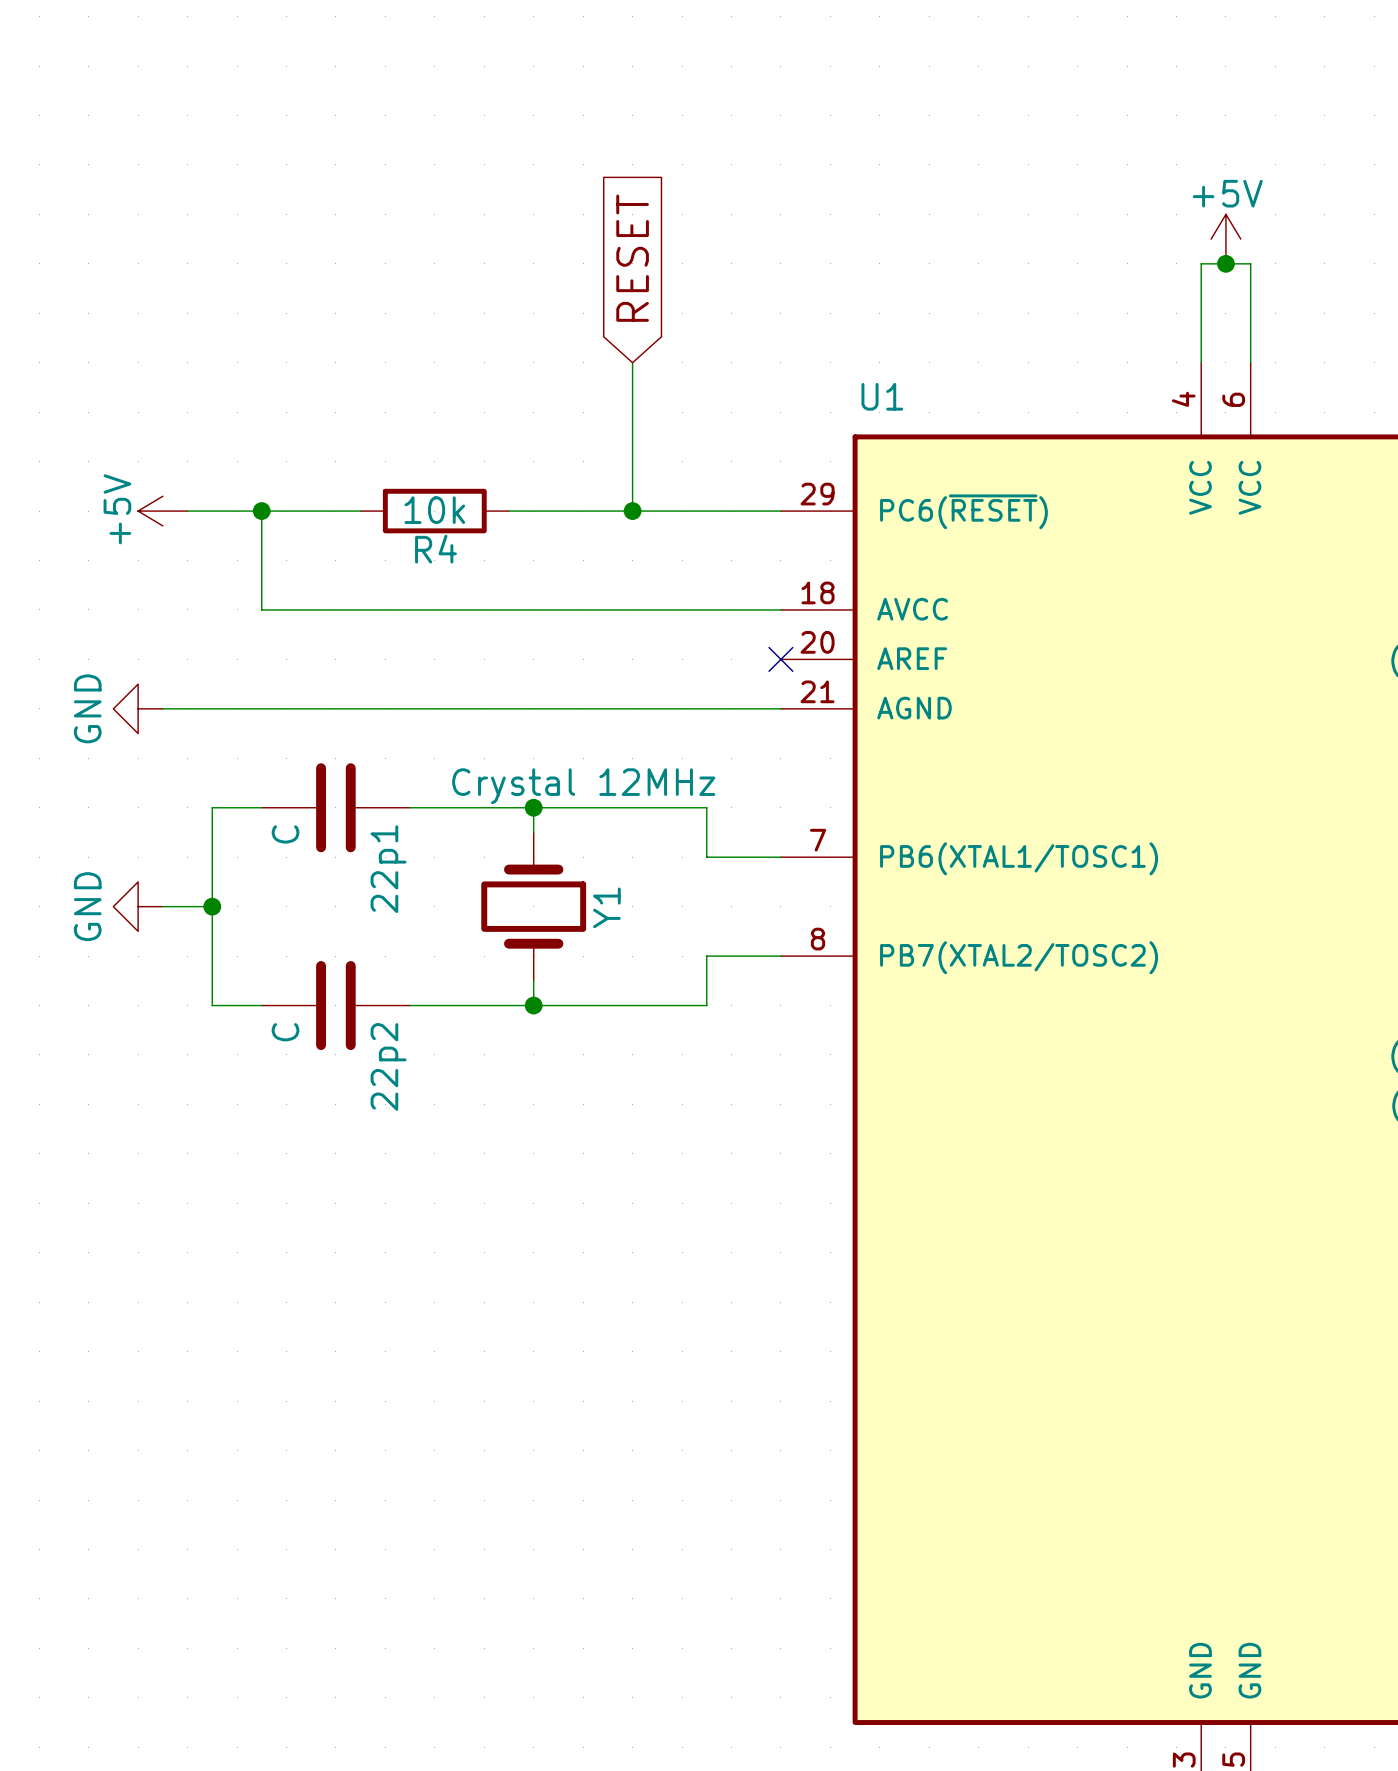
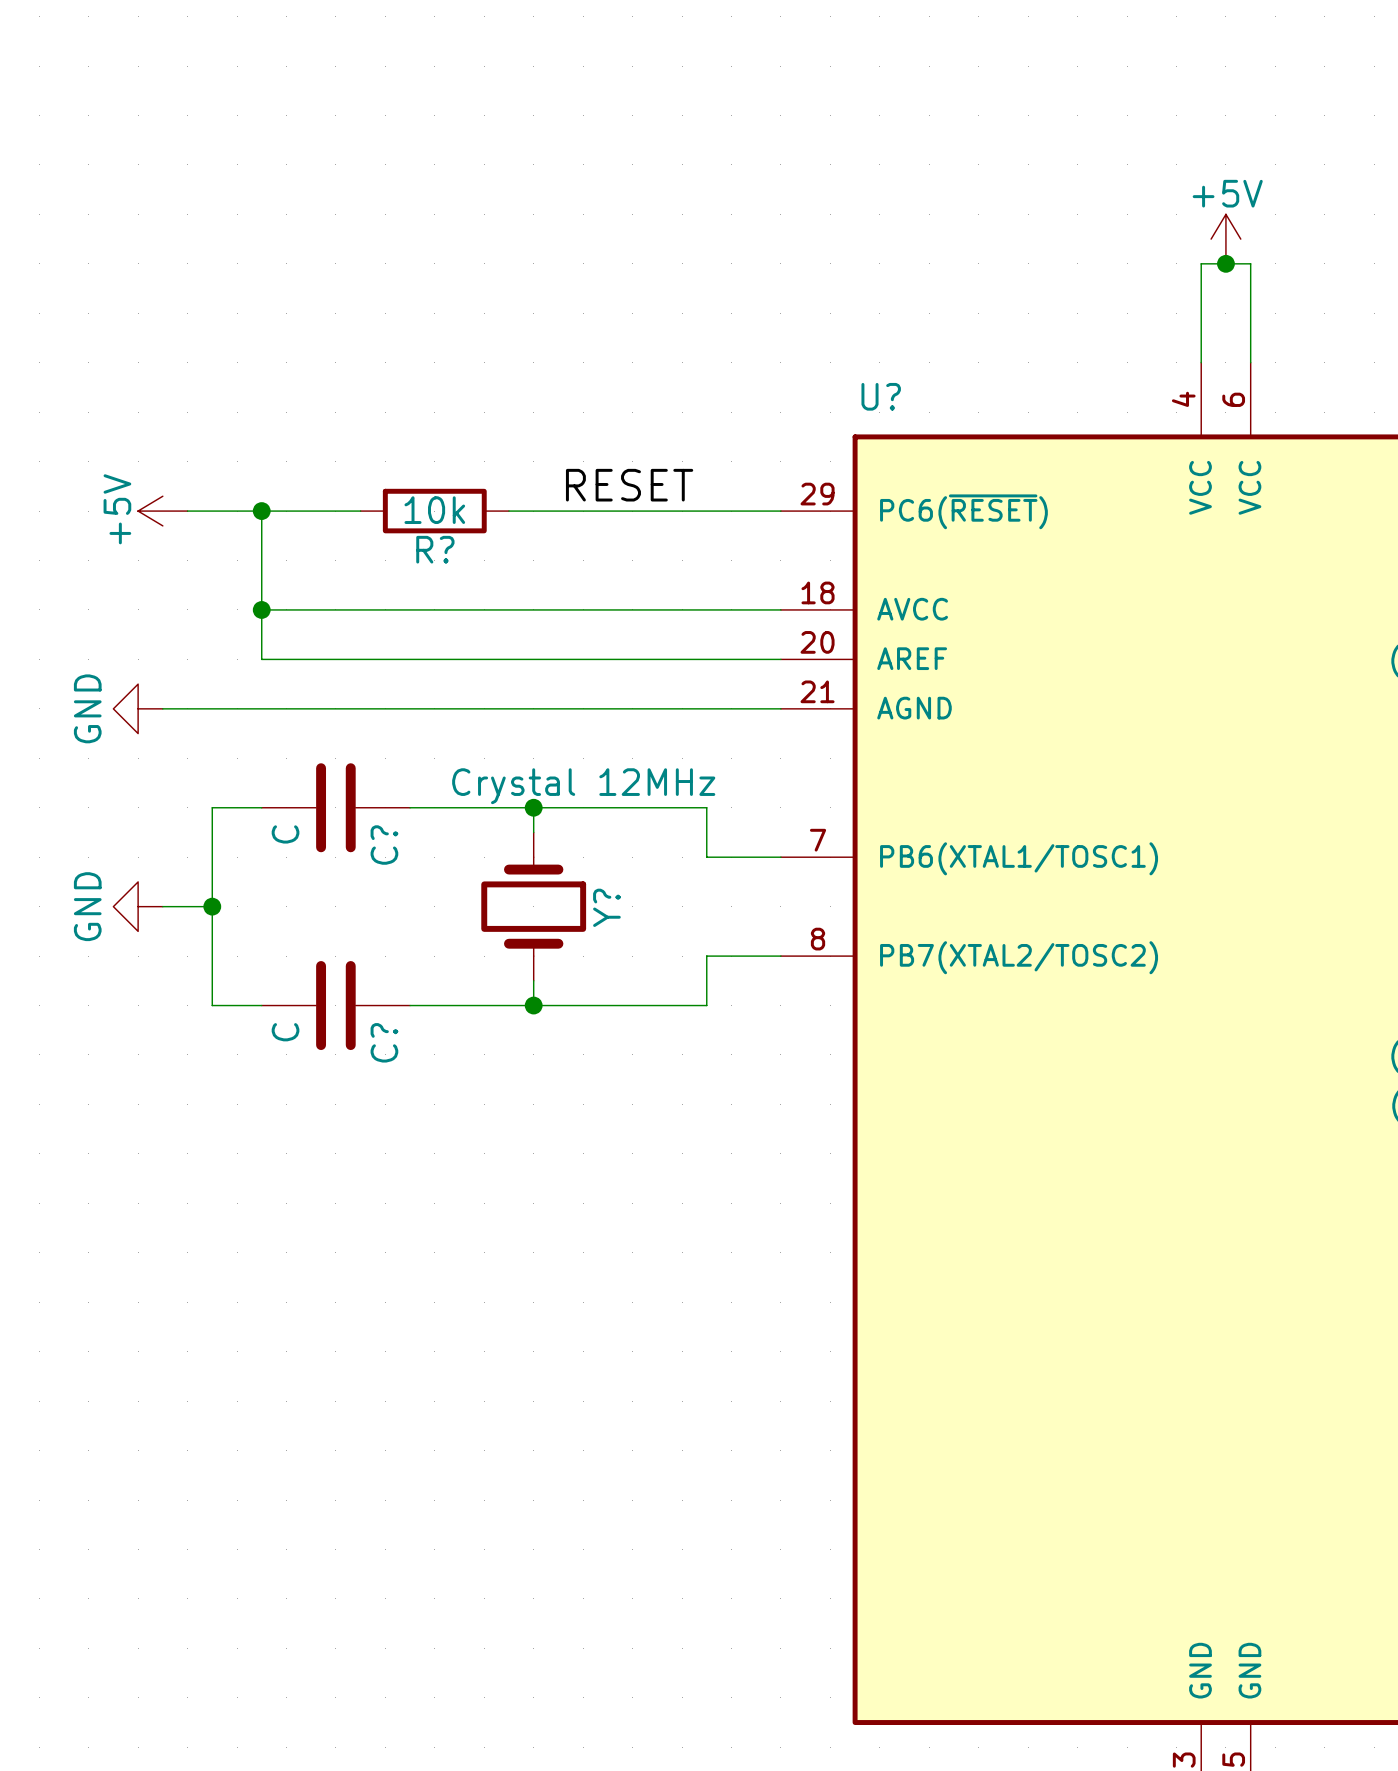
global label: RESET (632, 258) -> none
wire: (632, 362) (632, 511) -> none
U1 name: U1 (882, 396) -> U? (881, 396)
label: none -> RESET (629, 485)
junction: (632, 511) -> none
R4 name: R4 (435, 549) -> R? (435, 549)
wire: none -> (261, 609) (261, 659) (780, 659)
junction: none -> (261, 609)
no-connect mark: (780, 659) -> none
22p1 name: 22p1 (388, 869) -> C? (384, 845)
Y1 name: Y1 (606, 907) -> Y? (606, 907)
22p2 name: 22p2 (388, 1066) -> C? (384, 1042)

